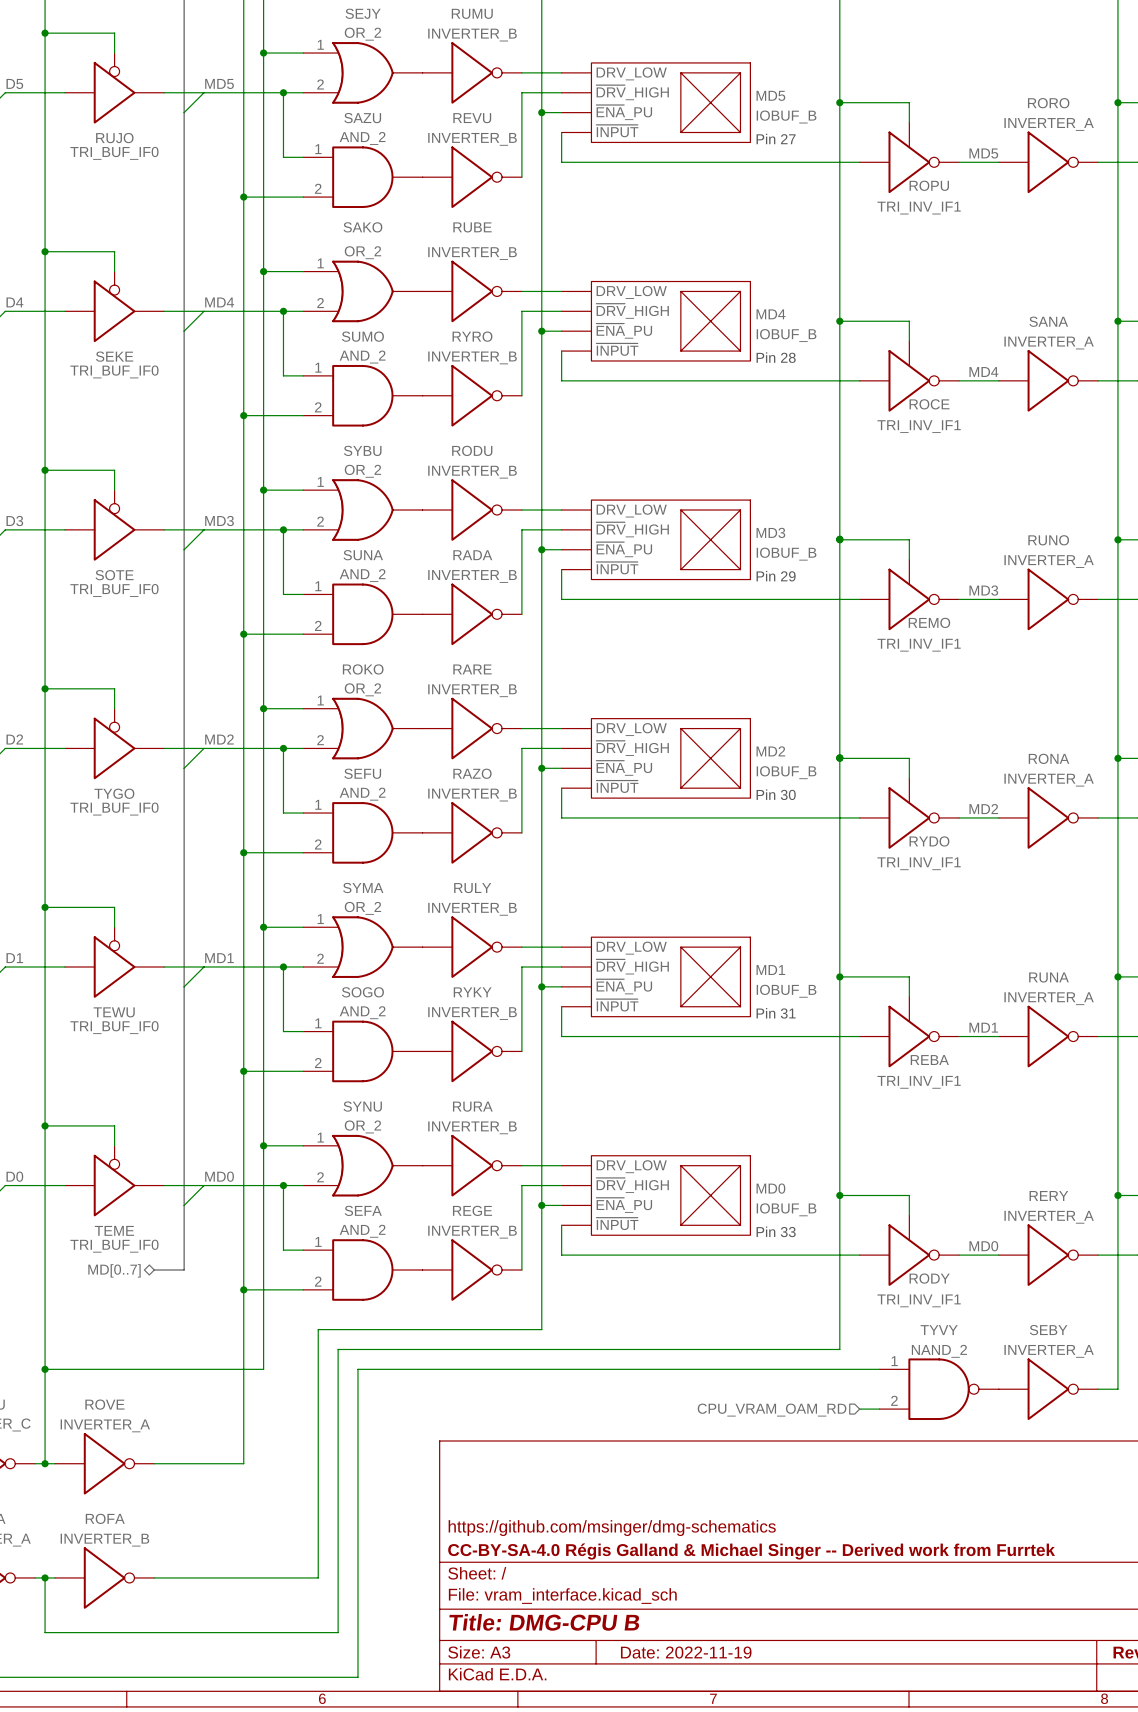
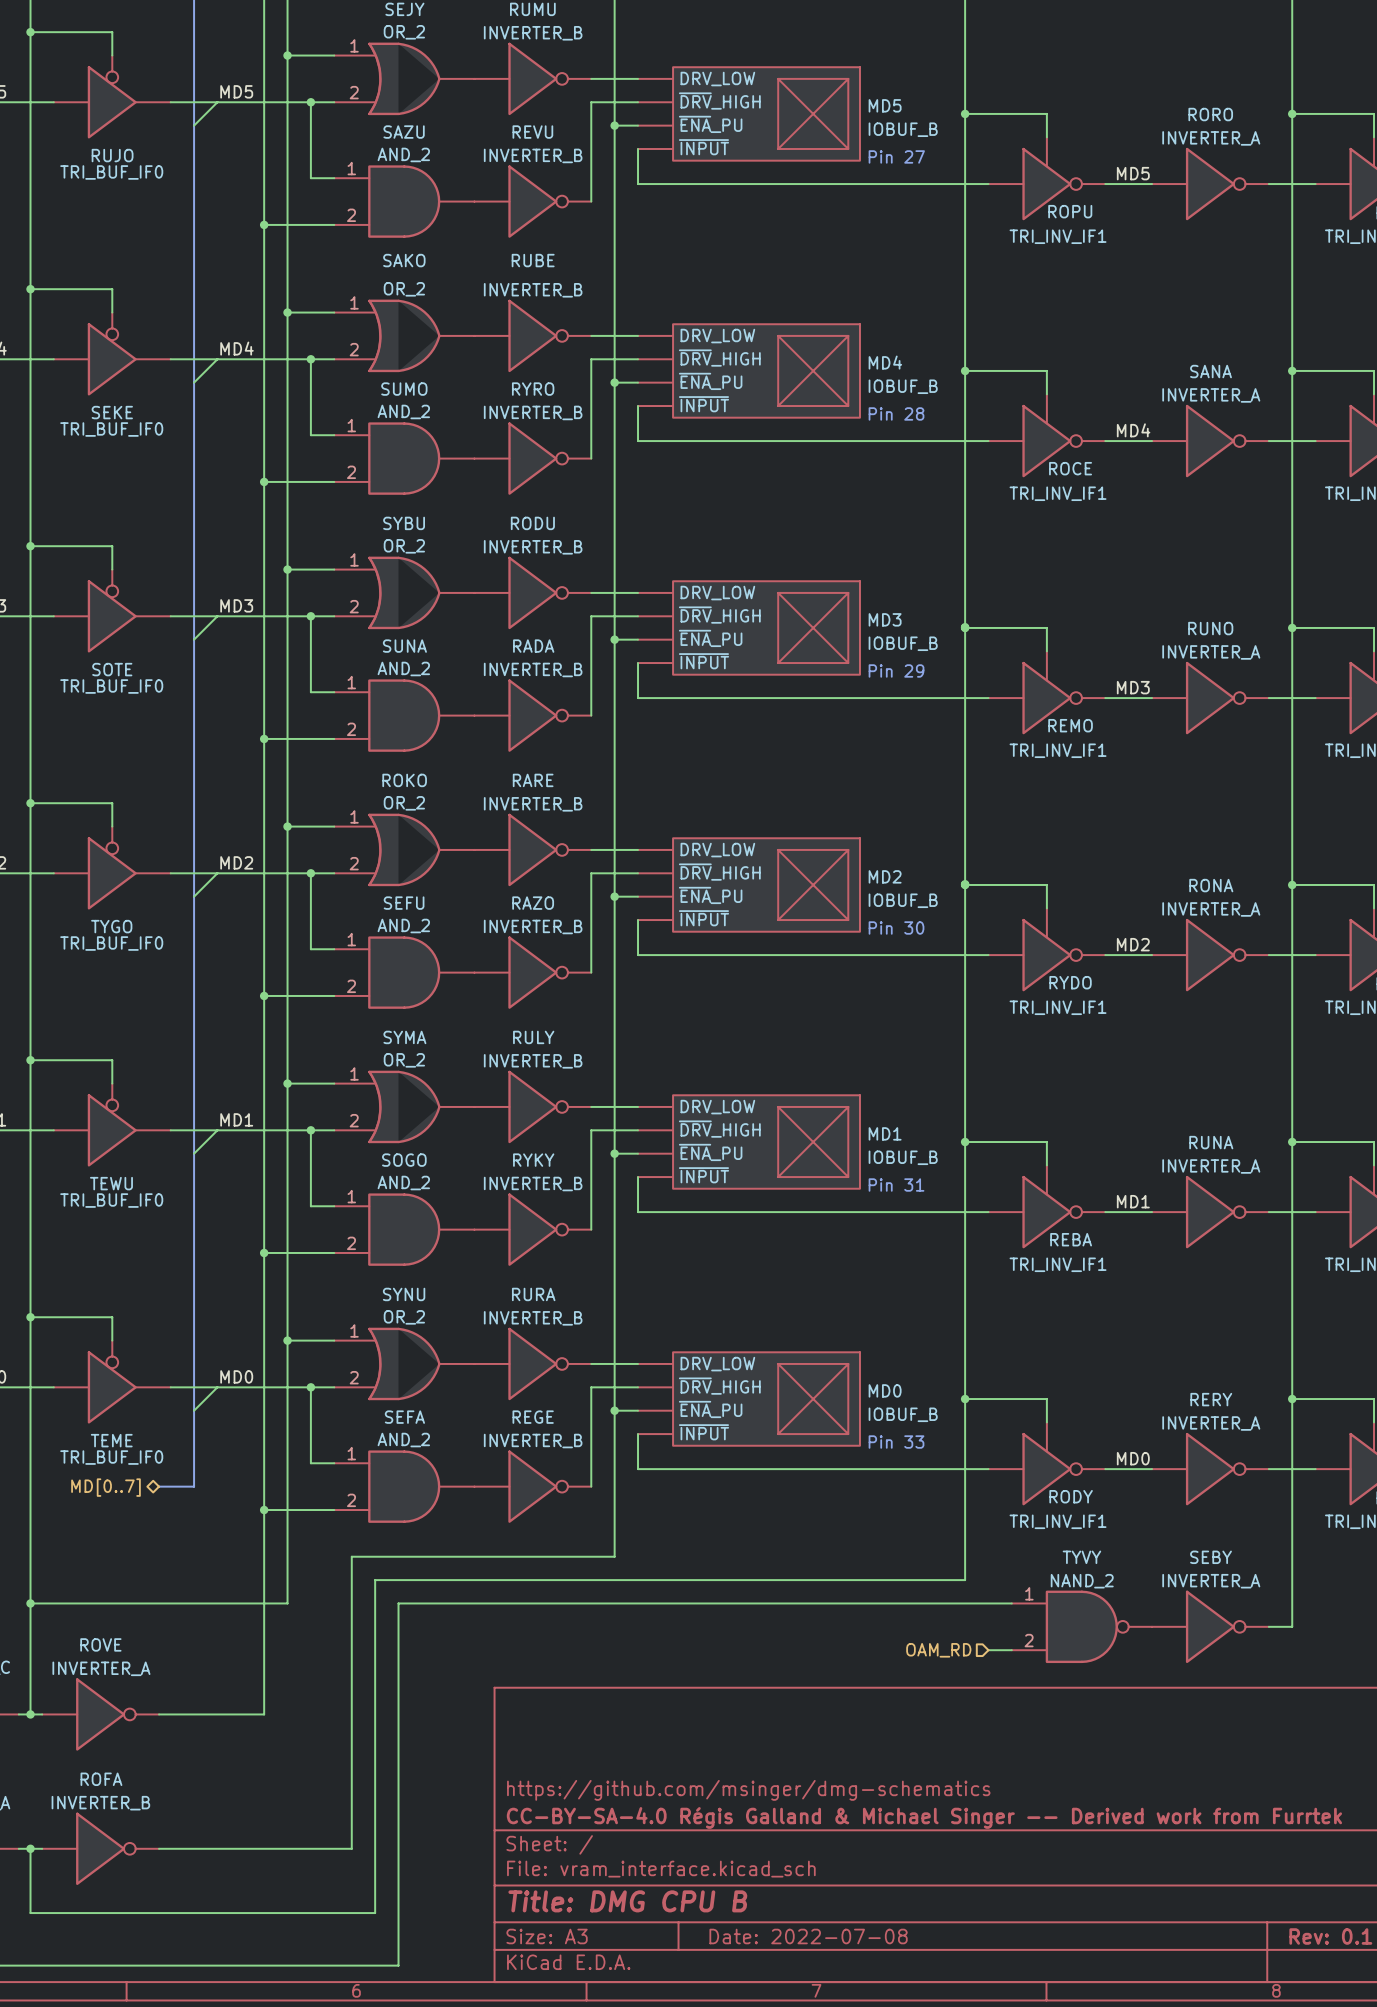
hierarchical label: CPU_VRAM_OAM_RD (772, 1410) -> OAM_RD (938, 1650)
title block: Title: DMG-CPU B (544, 1622) -> Title: DMG CPU B (627, 1901)
title block: Date: 2022-11-19 (686, 1652) -> Date: 2022-07-08 (808, 1936)

